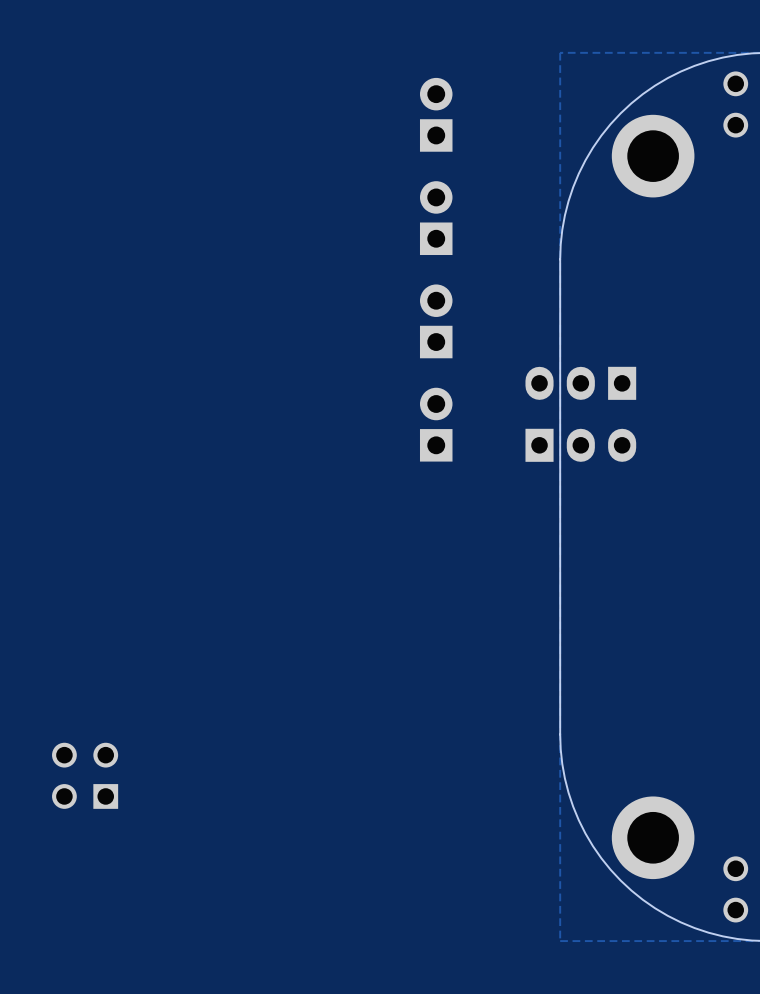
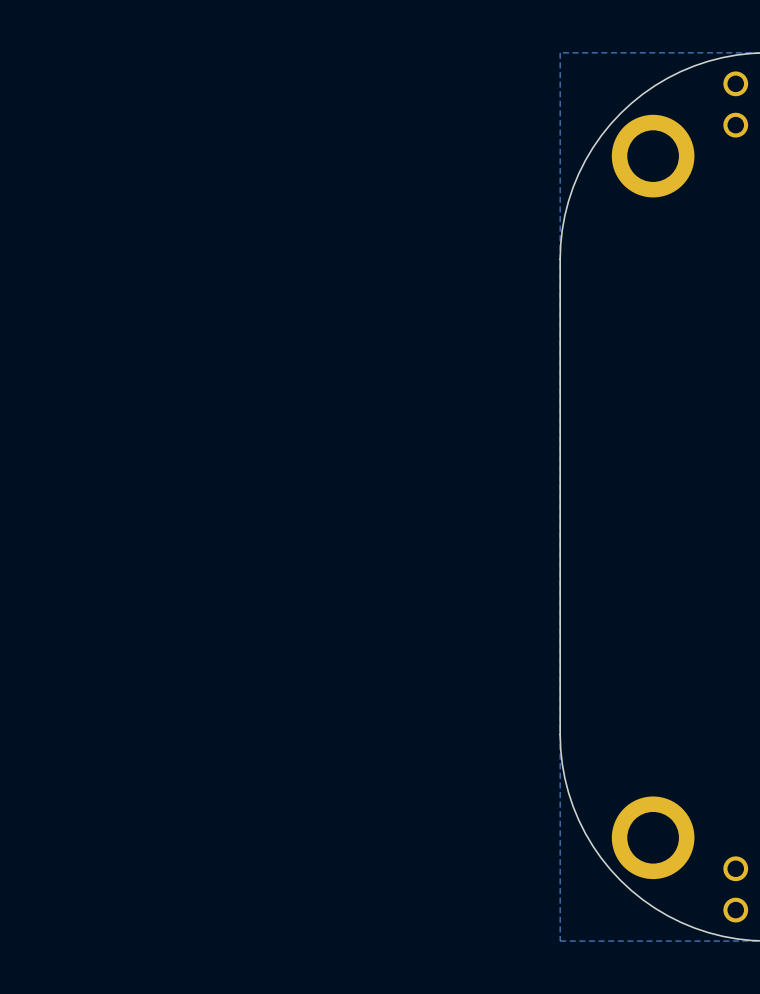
part: (436, 114) -> none
part: (436, 218) -> none
part: (436, 321) -> none
part: (580, 383) -> none
part: (436, 424) -> none
part: (580, 445) -> none
part: (85, 775) -> none

